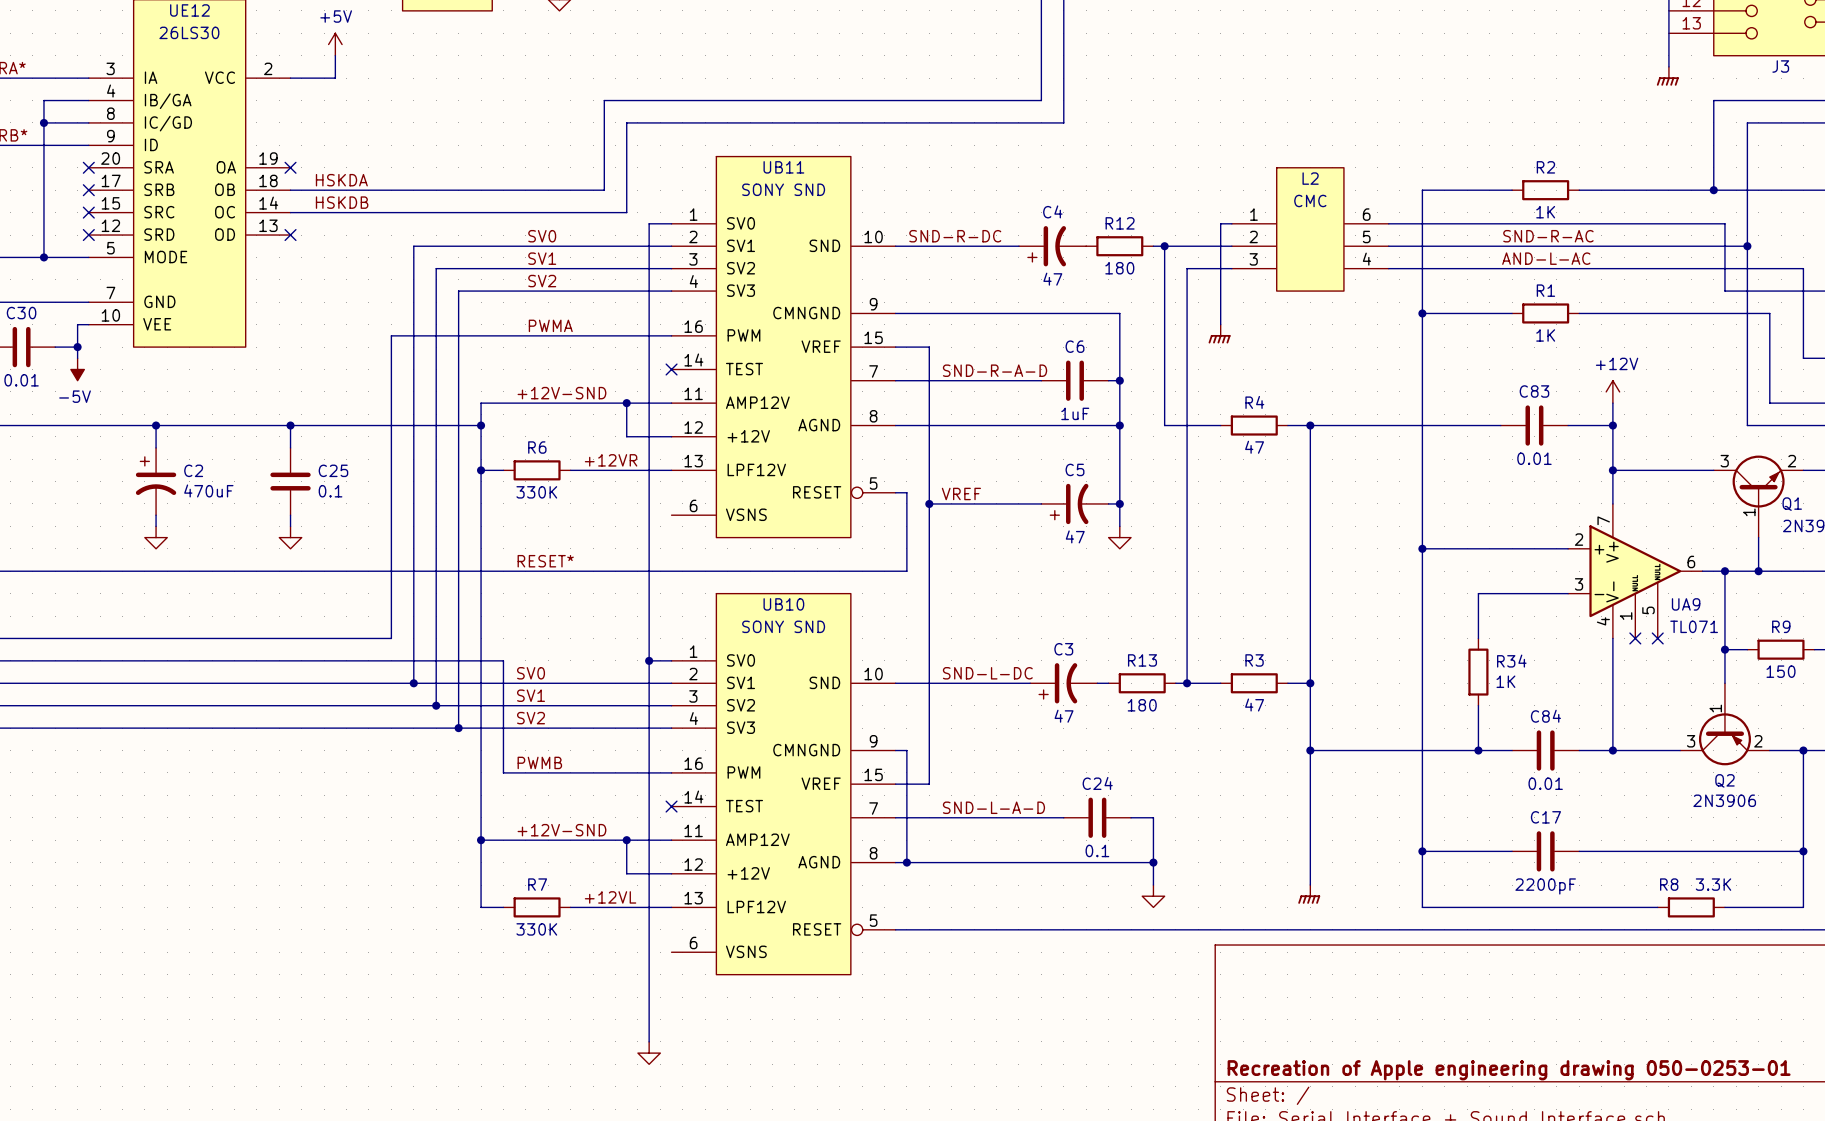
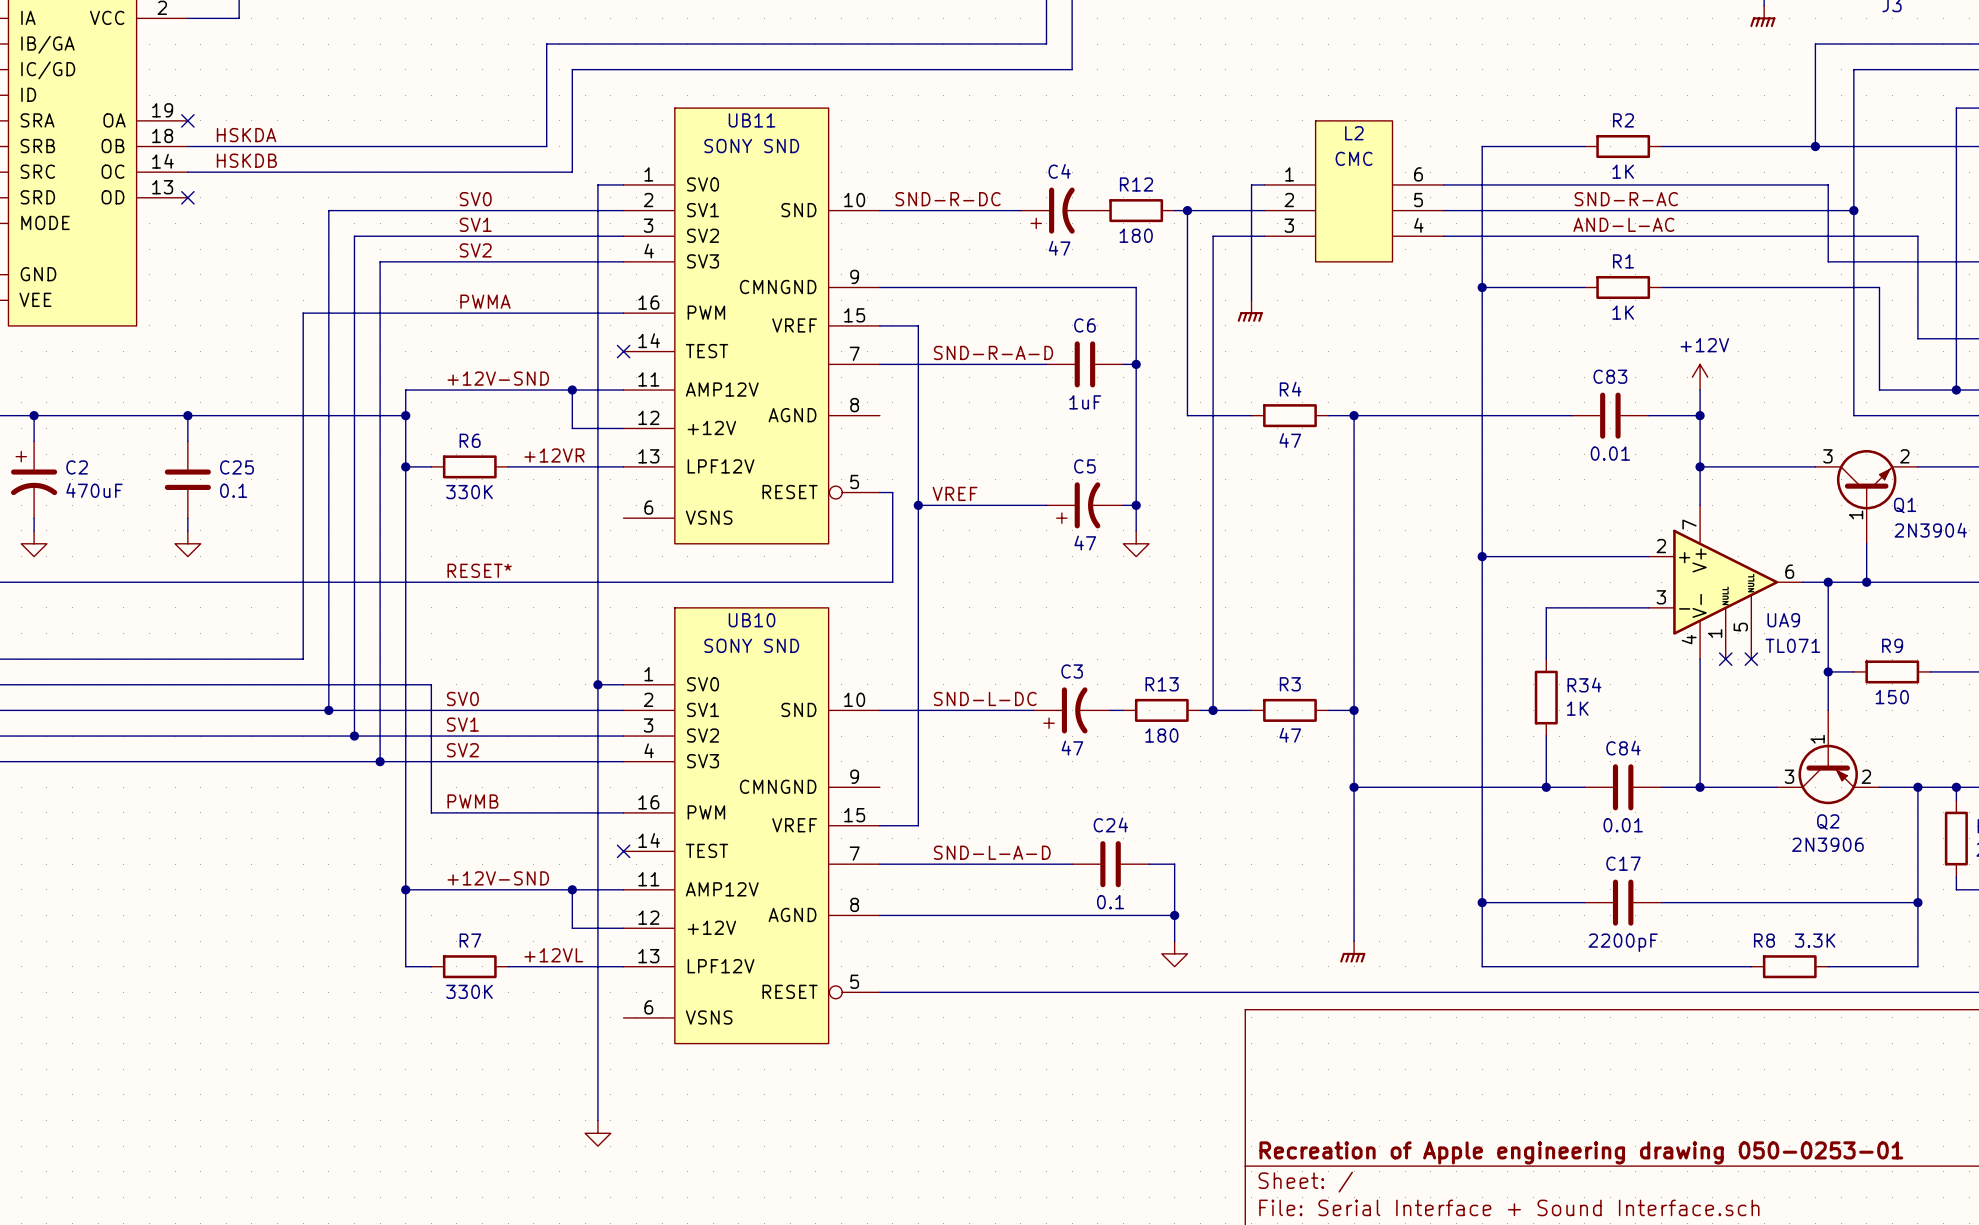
wire: (895, 425) (1119, 425) -> none
junction: (1119, 425) -> none
wire: (895, 750) (906, 750) (906, 862) -> none
junction: (906, 862) -> none

